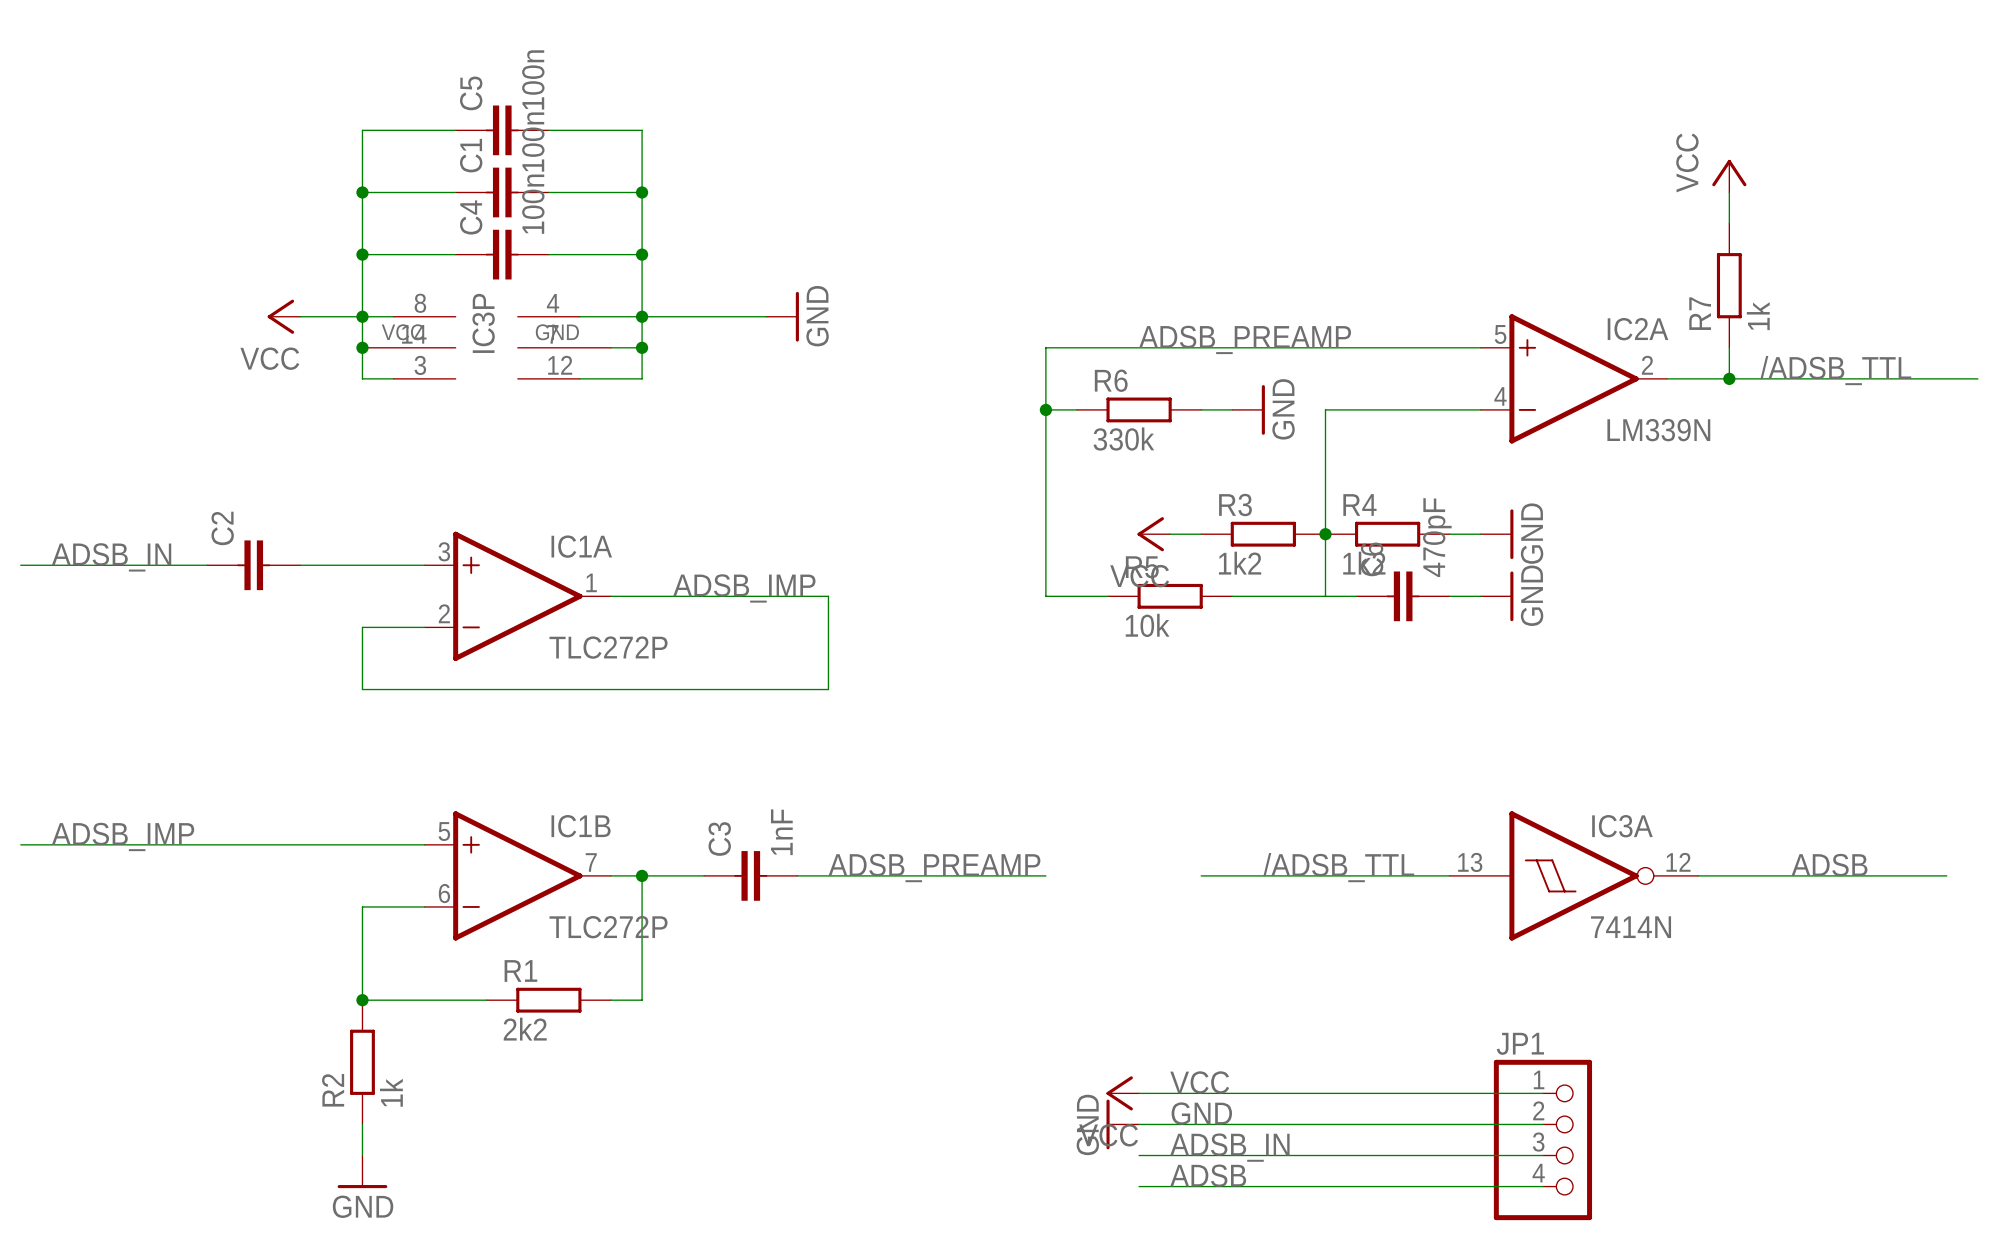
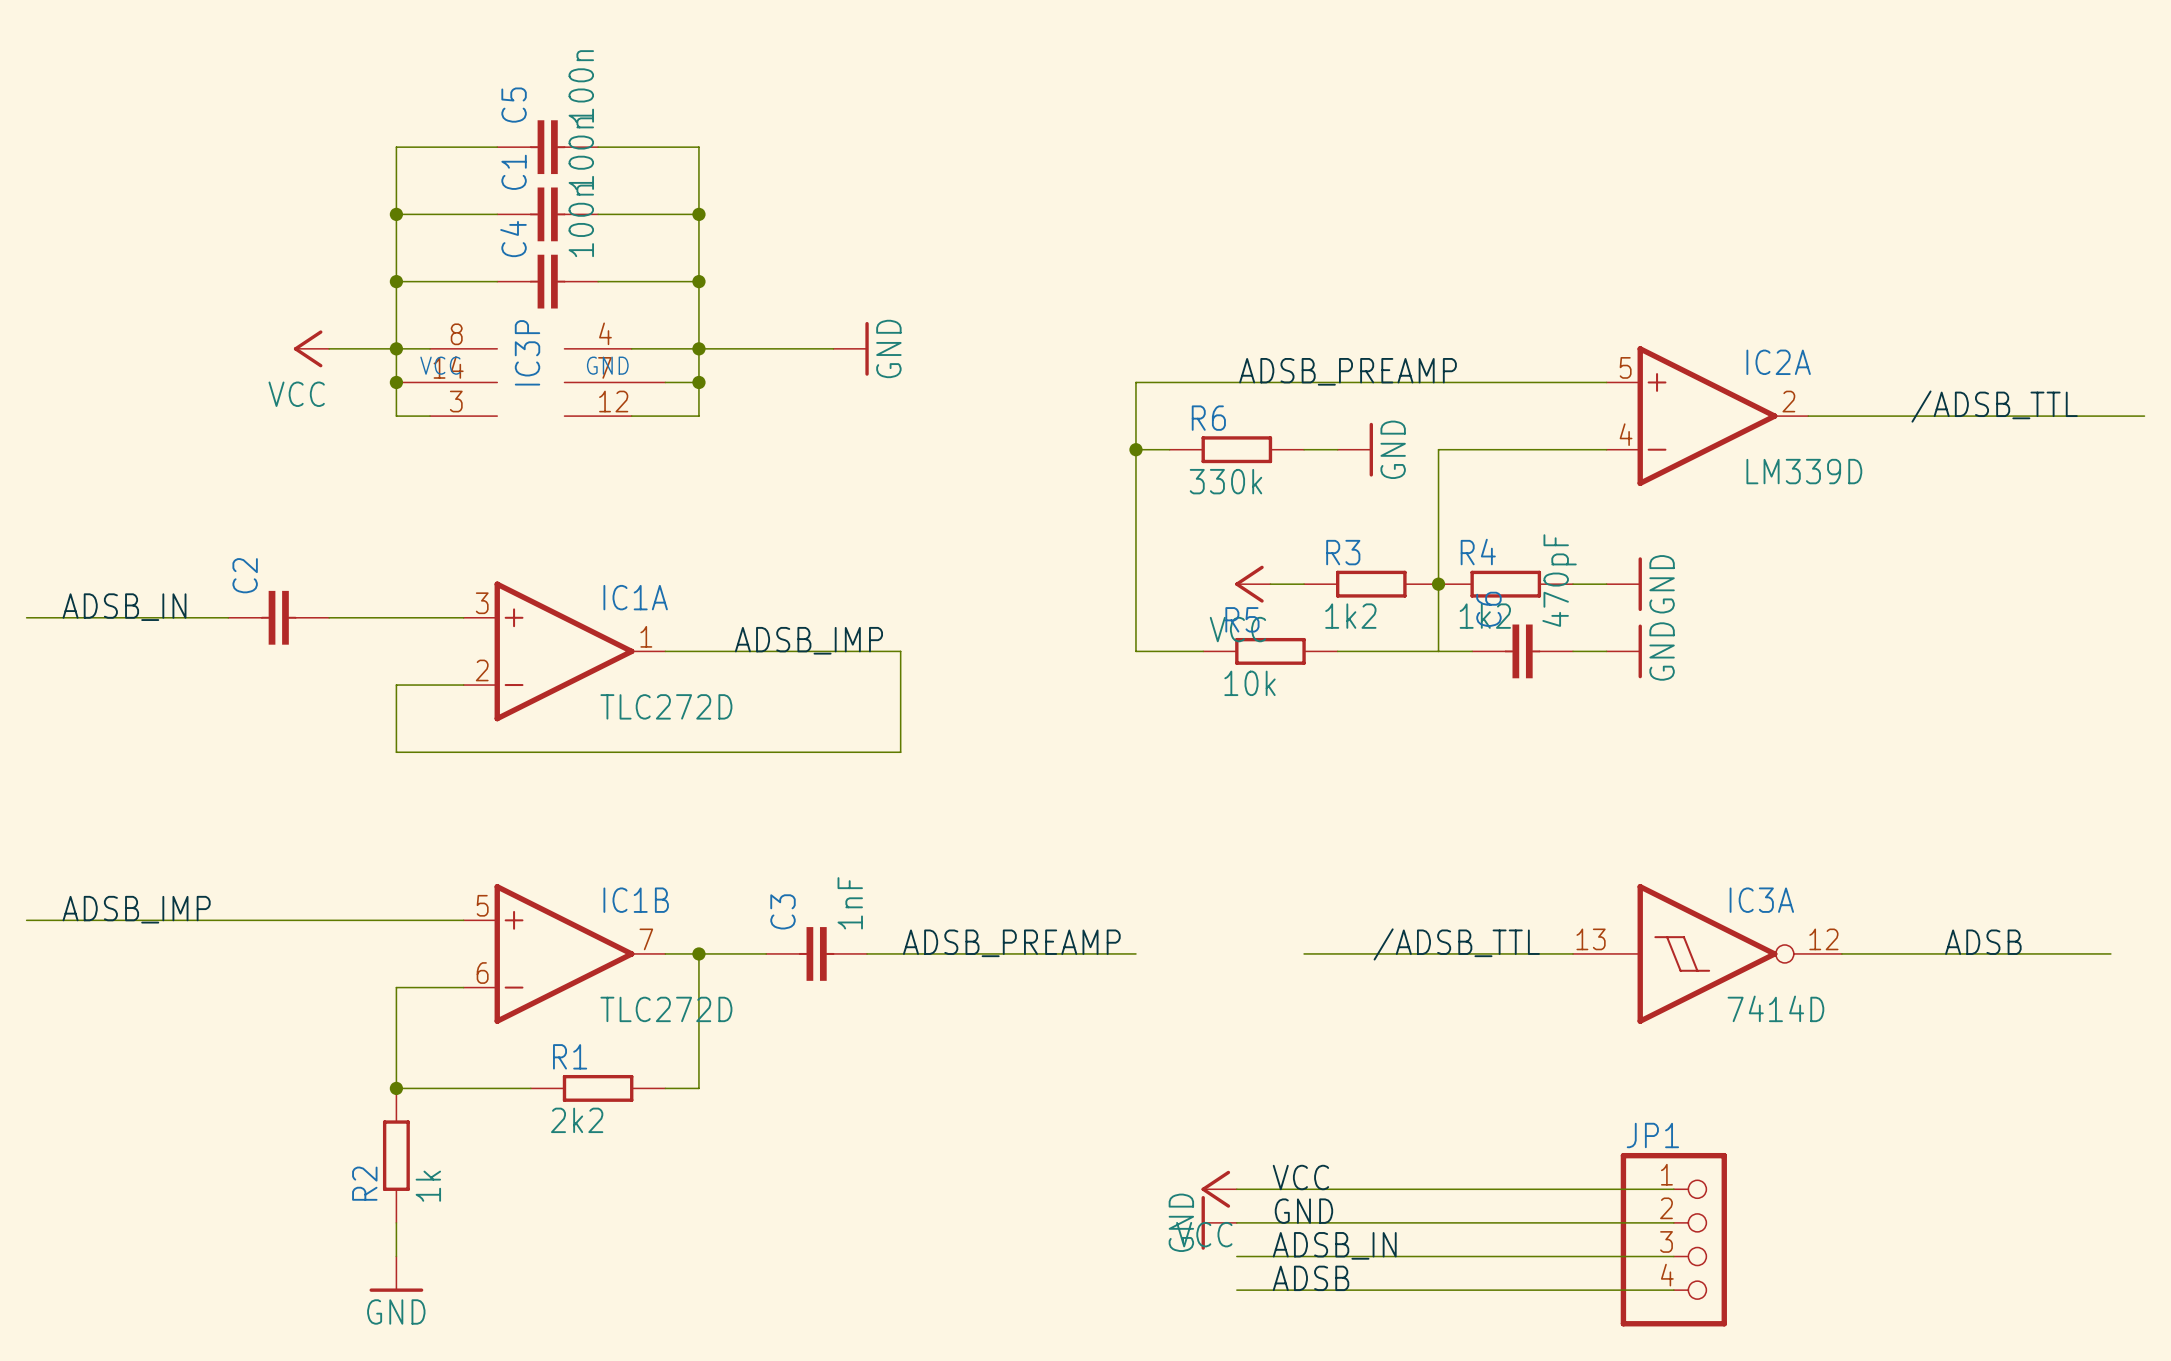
power symbol: VCC (1729, 176) -> none
wire: (1729, 192) (1729, 223) -> none
R7: 1k (1729, 285) -> none
wire: (1729, 347) (1729, 378) -> none
junction: (1729, 378) -> none
IC2A value: LM339N (1658, 430) -> LM339D (1804, 471)
IC1A value: TLC272P (608, 647) -> TLC272D (666, 706)
IC1B value: TLC272P (608, 927) -> TLC272D (666, 1009)
IC3A value: 7414N (1631, 927) -> 7414D (1775, 1008)

